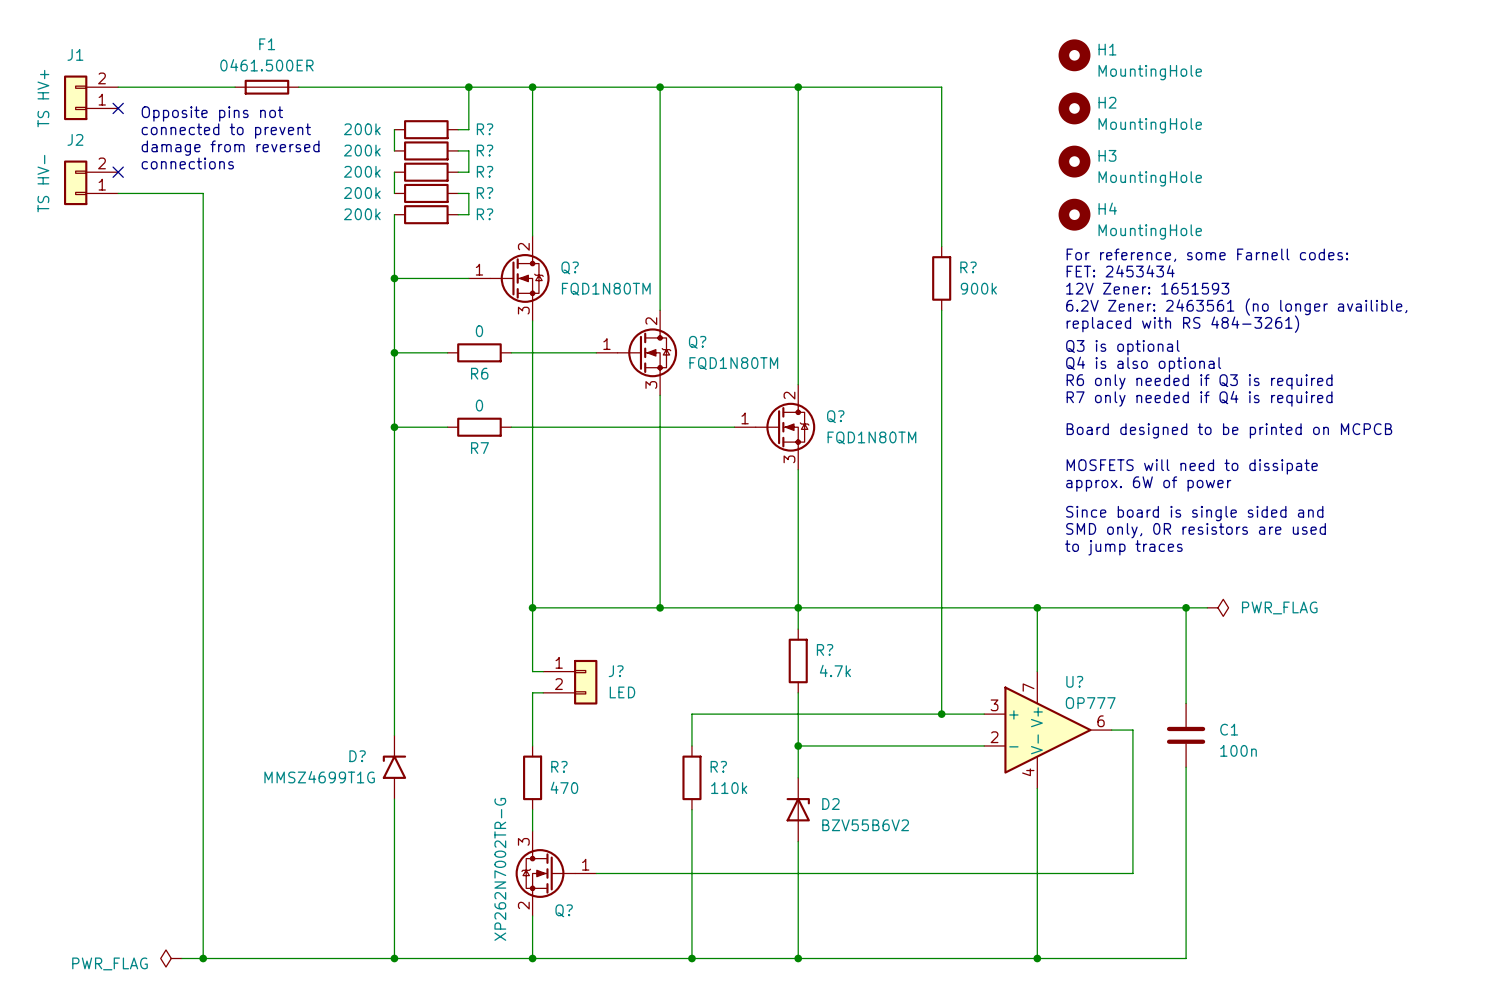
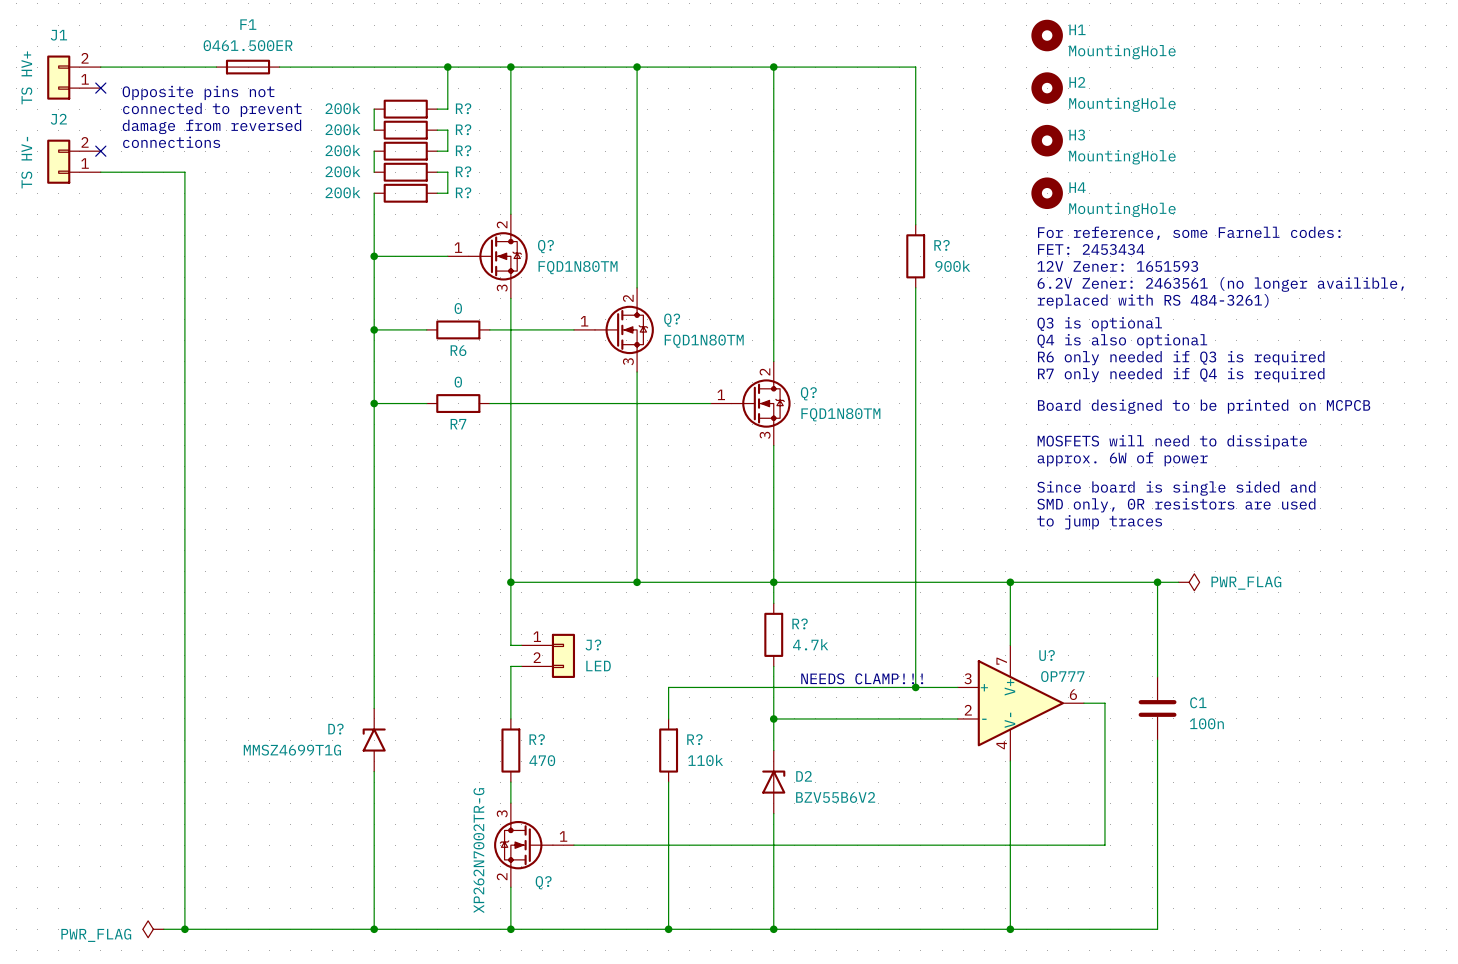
text: none -> NEEDS CLAMP!!! (862, 678)

